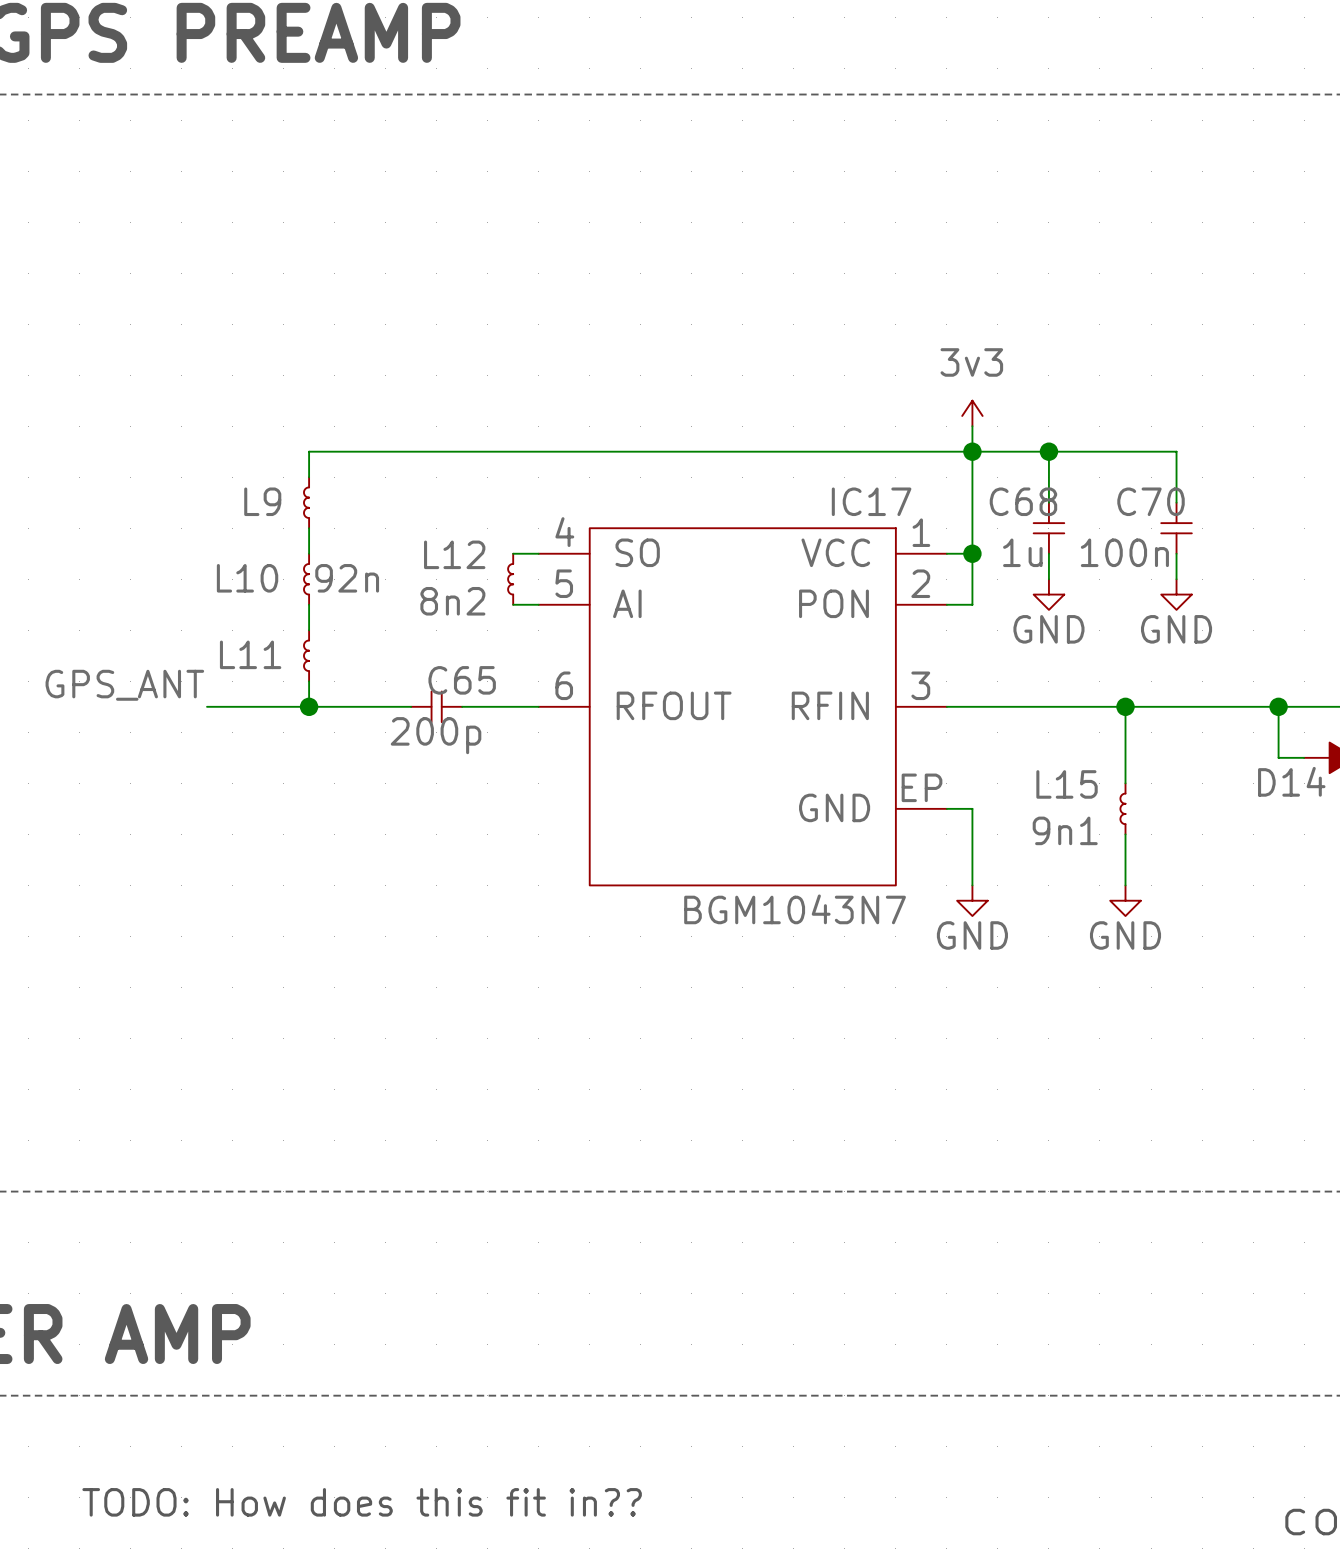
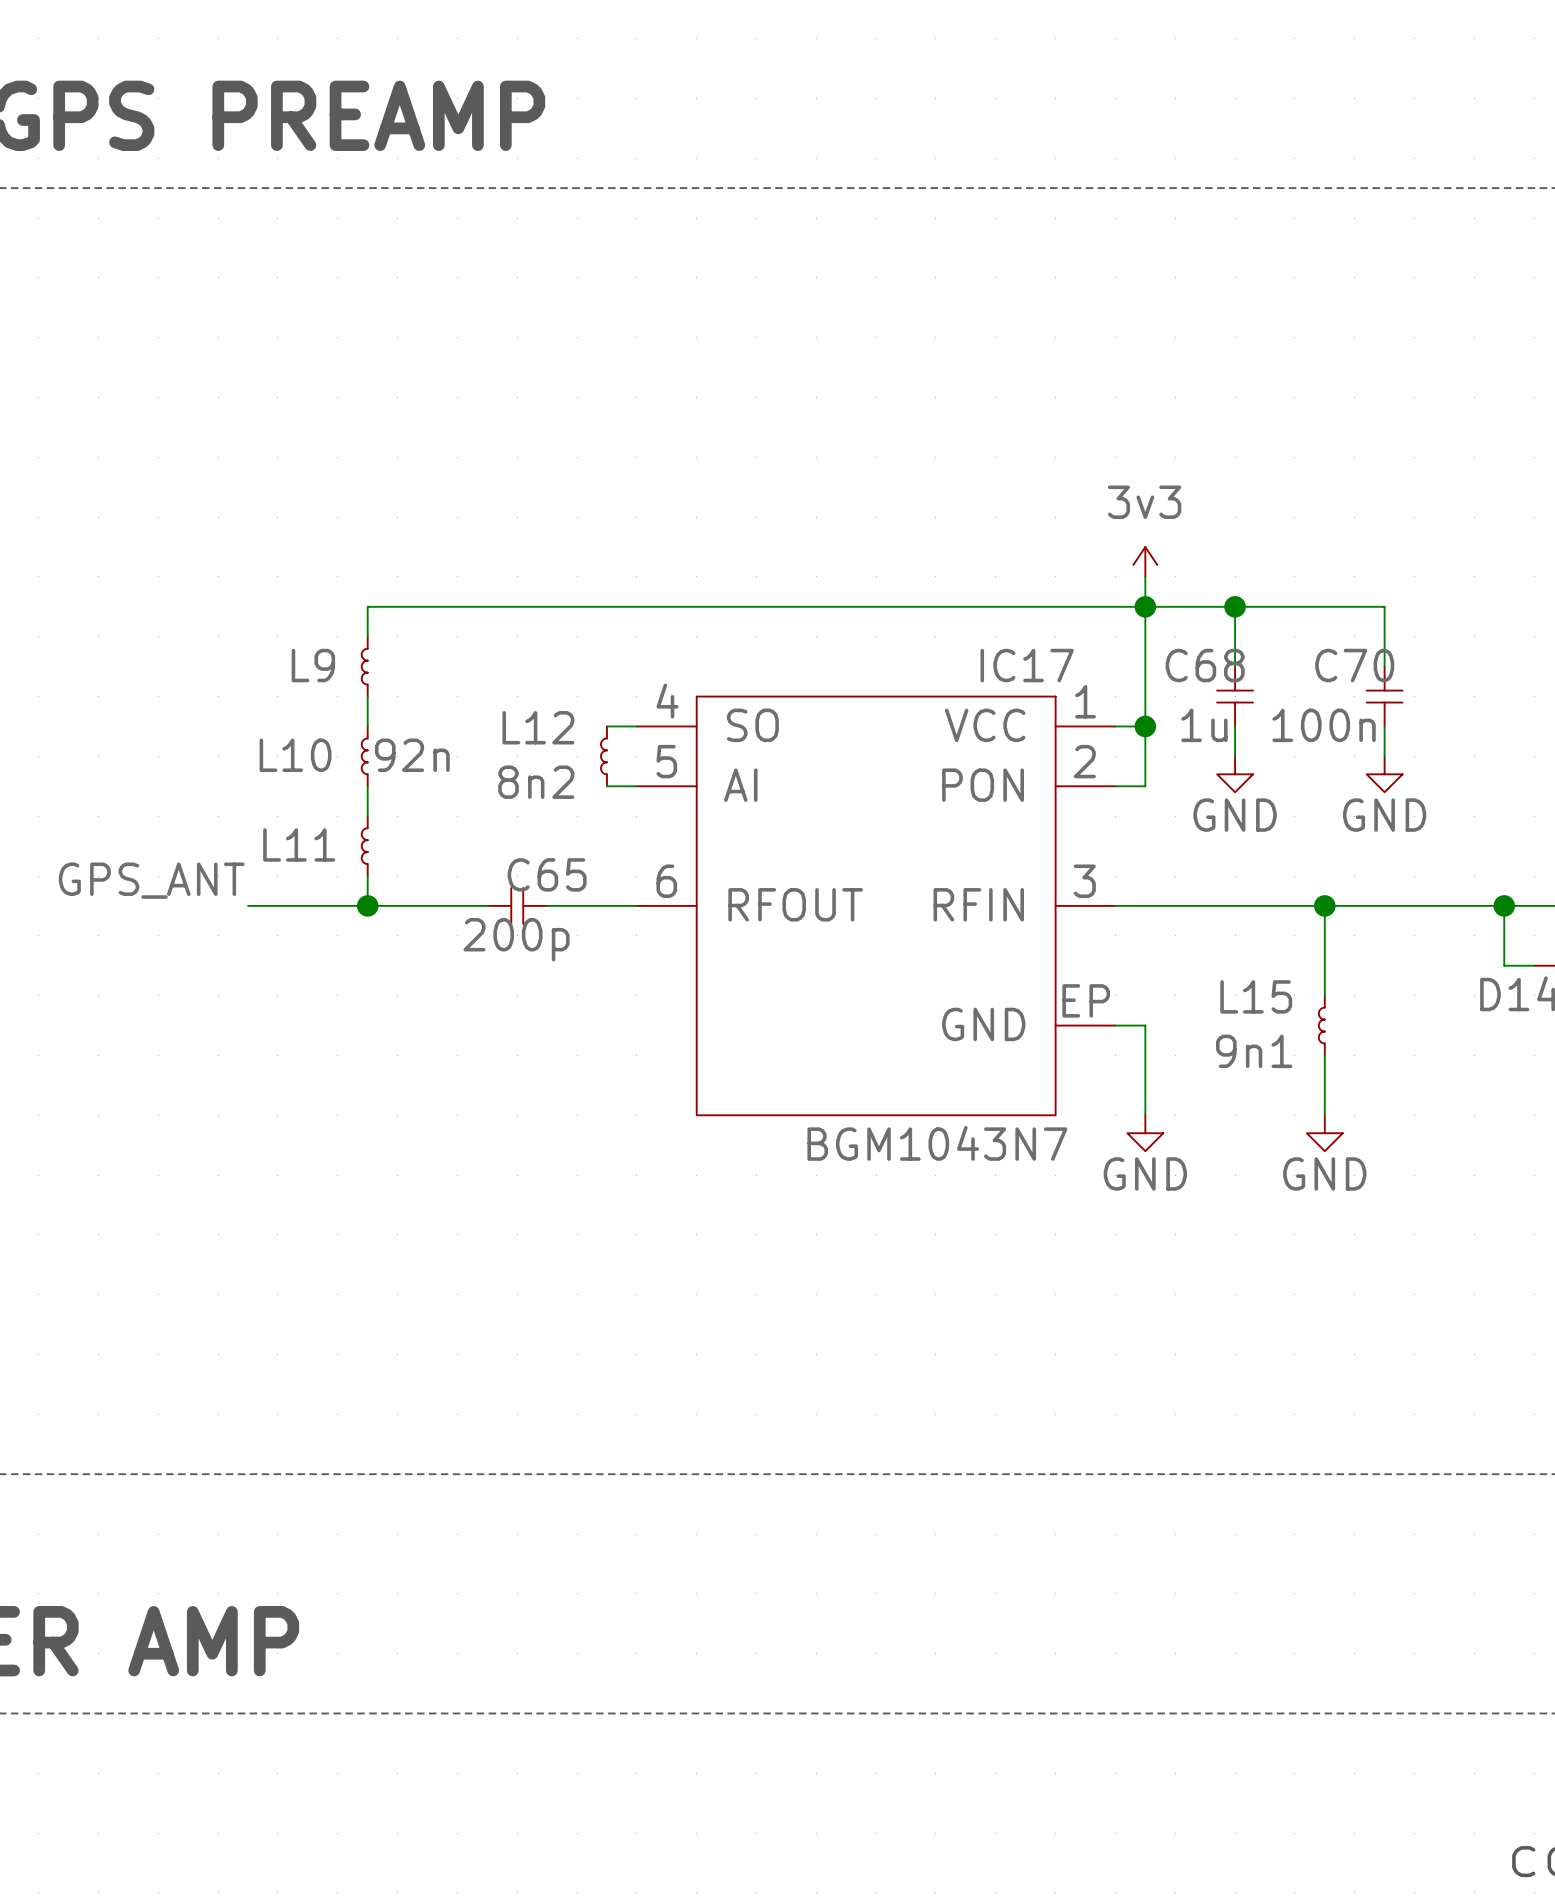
text: TODO: How does this fit in?? (362, 1502) -> none

